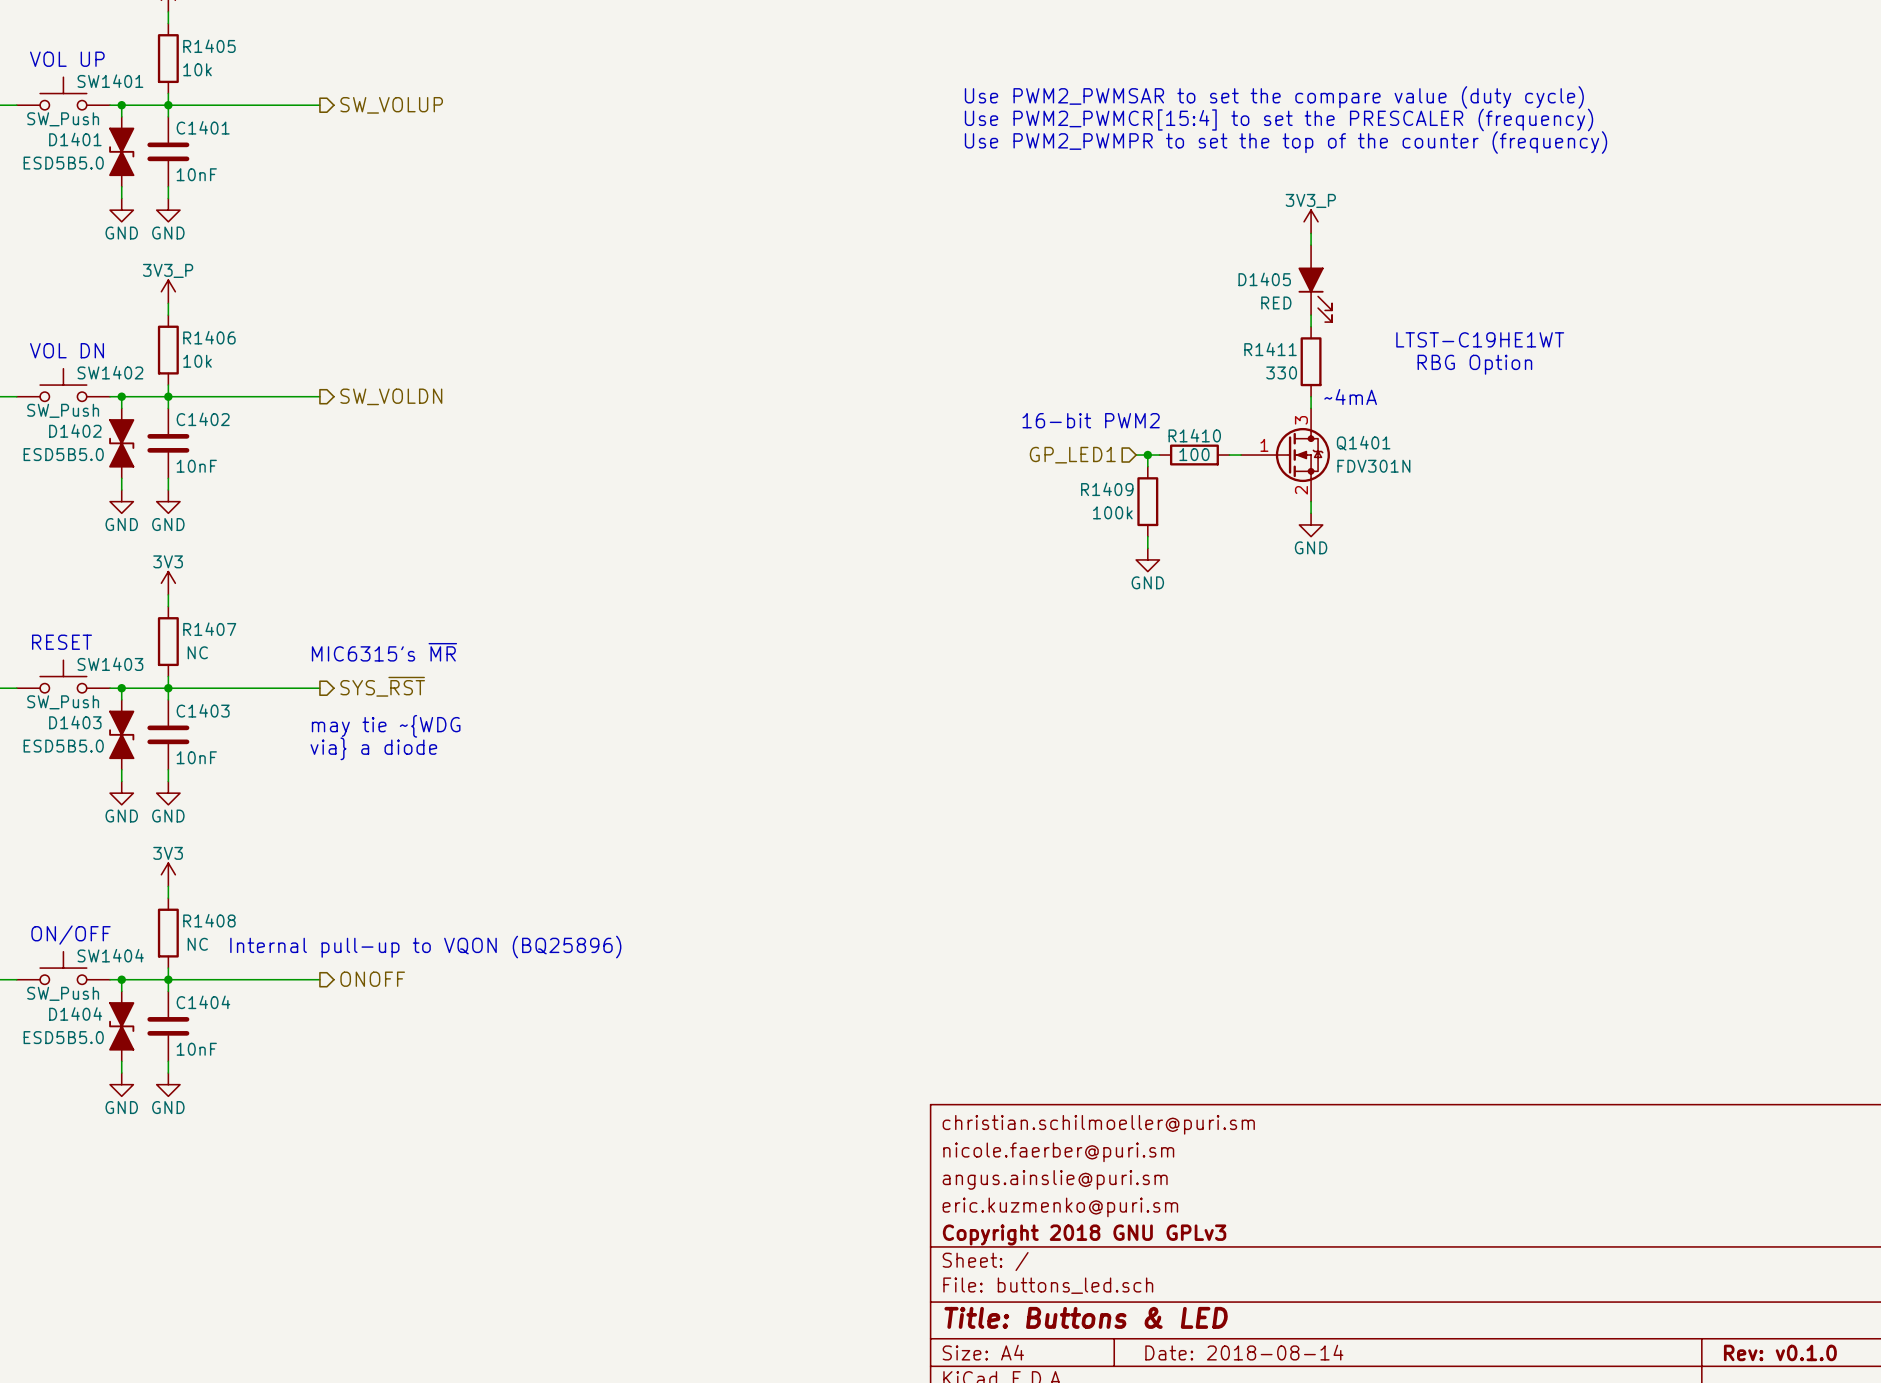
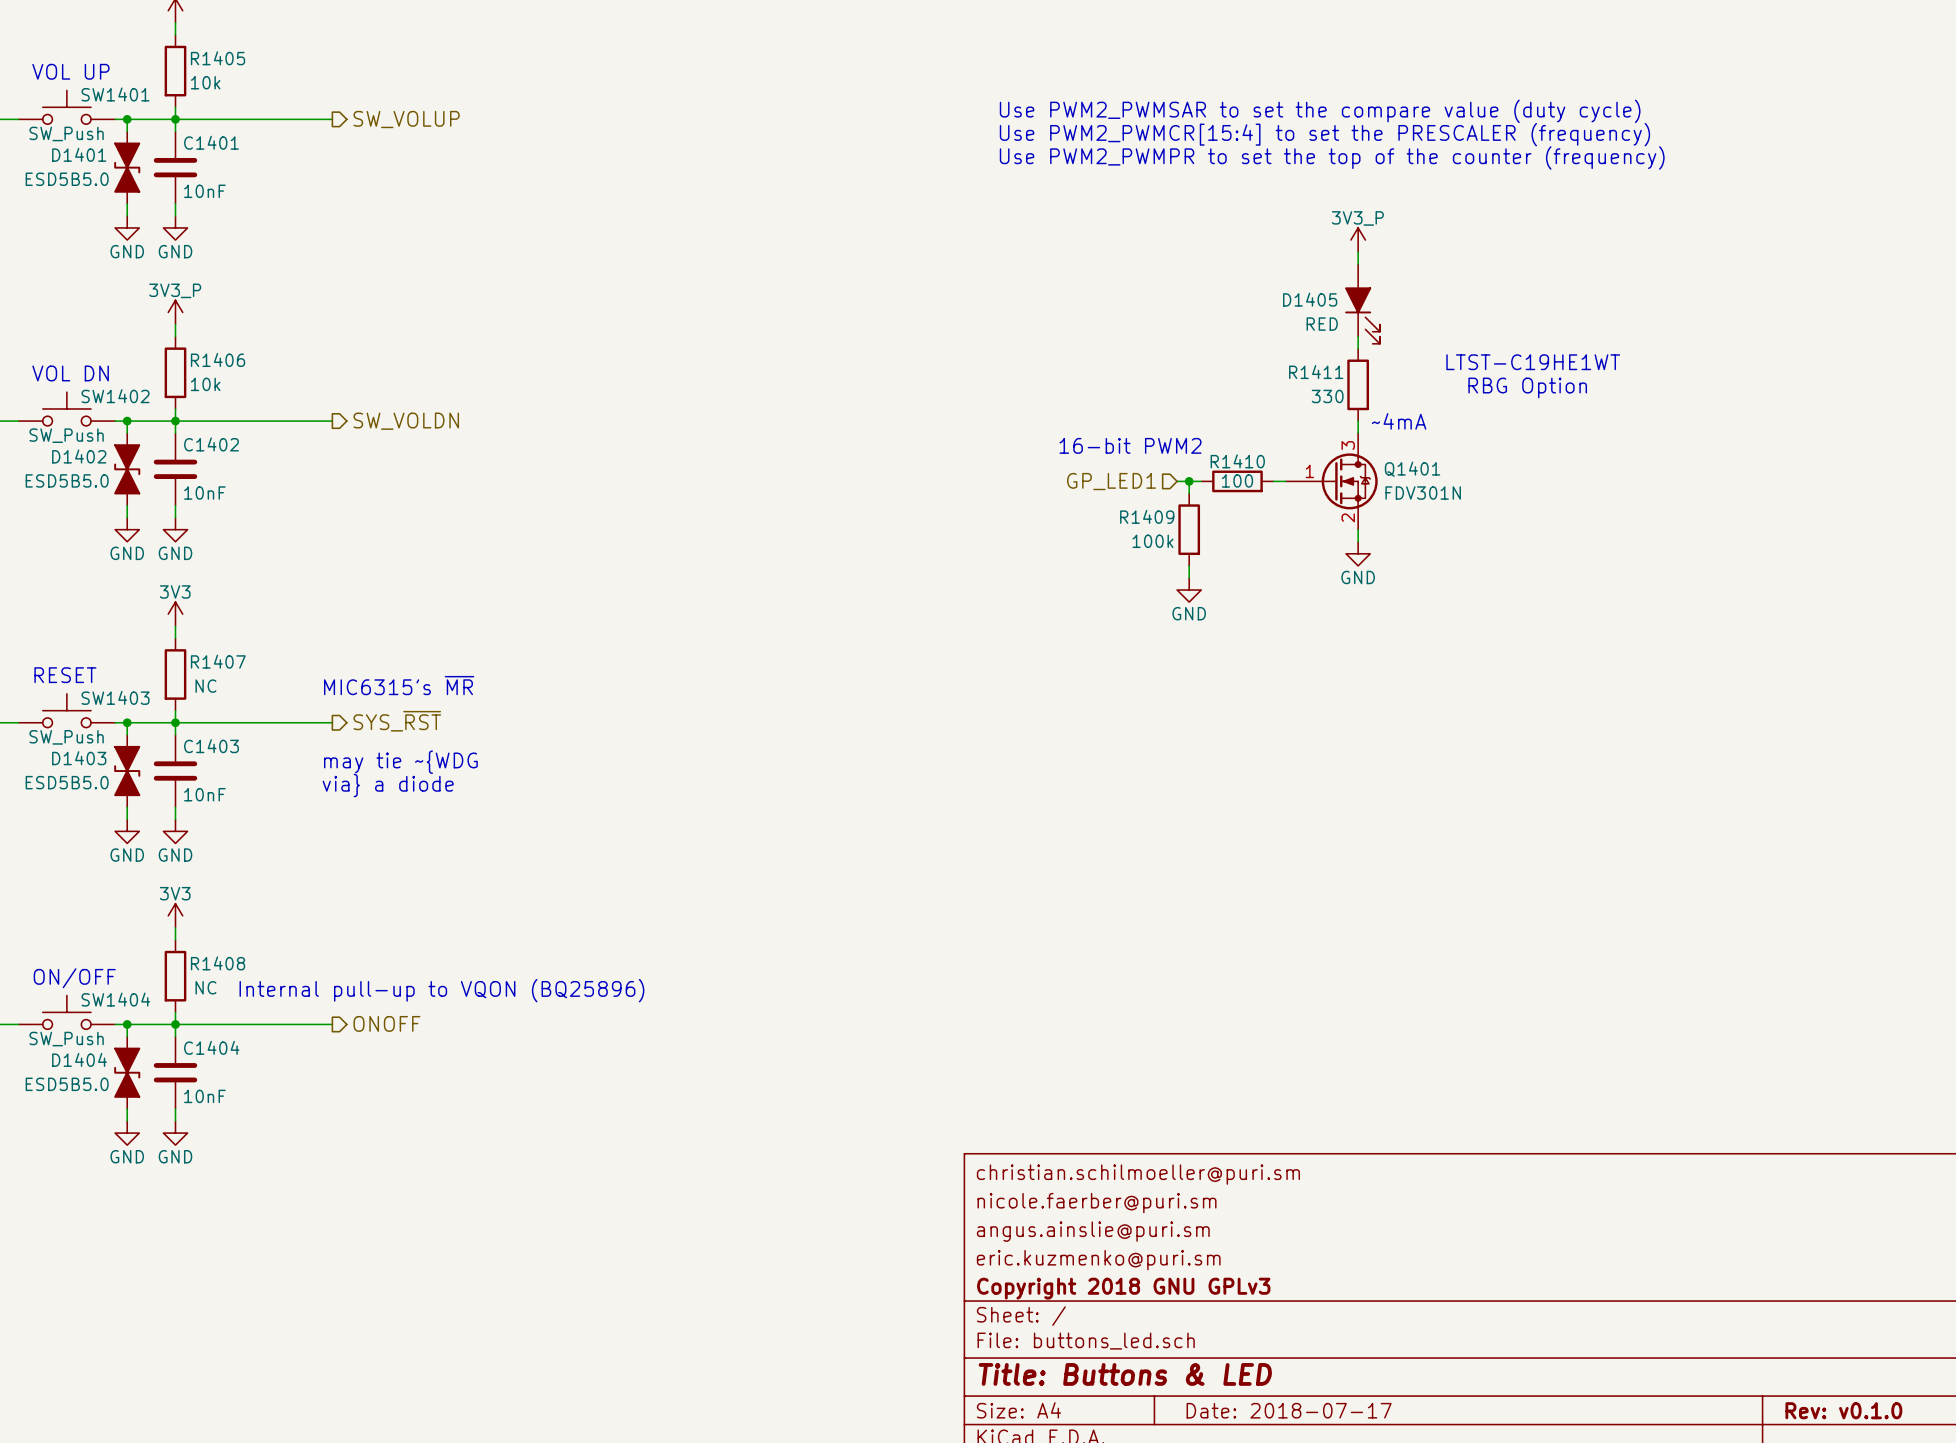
title block: Date: 2018-08-14 (1244, 1352) -> Date: 2018-07-17 (1289, 1410)

